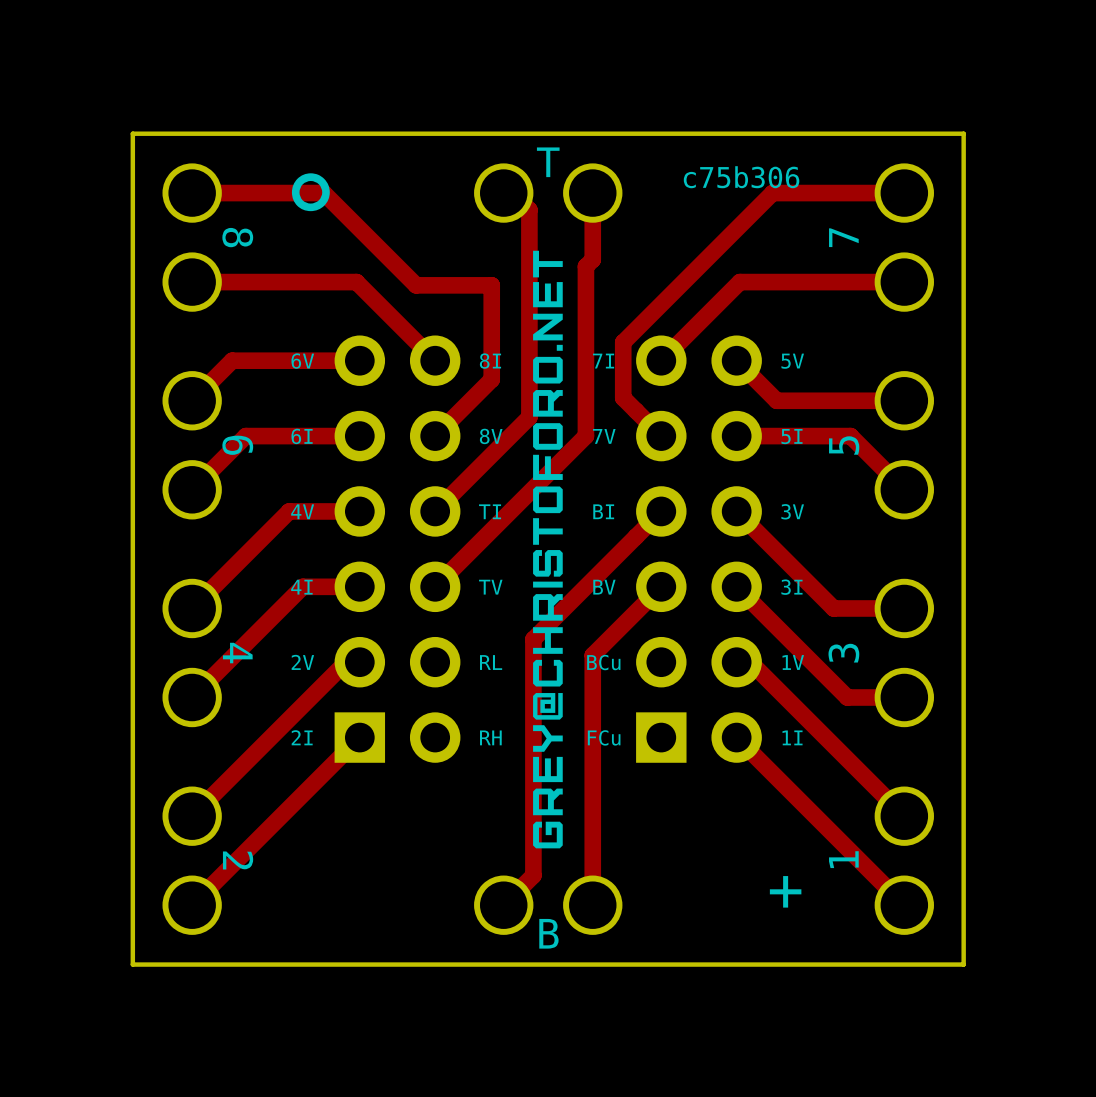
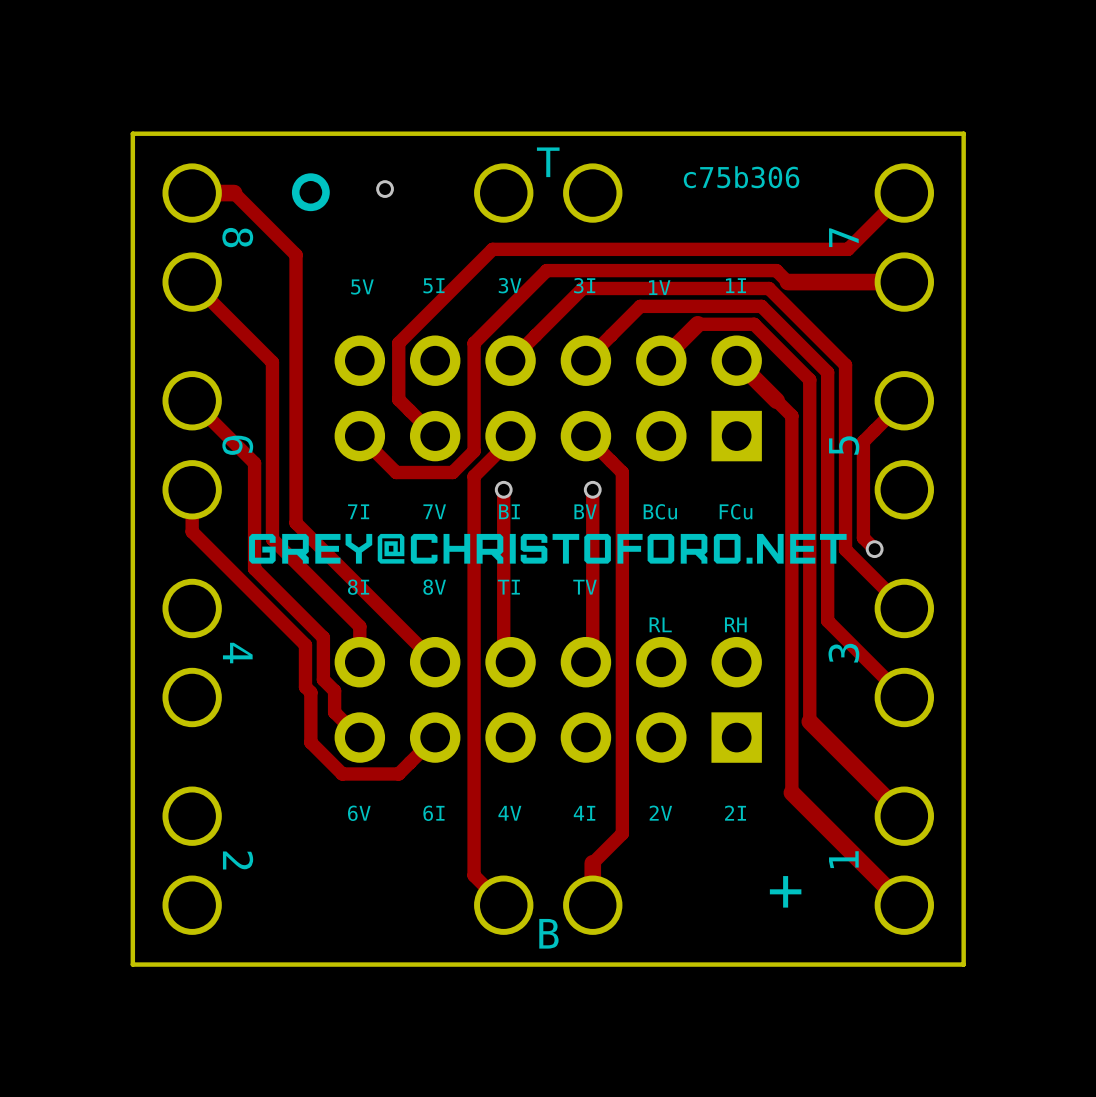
via: none -> (385, 189)
track: (234, 193) (323, 193) (416, 285) (491, 285) (491, 379) (435, 436) -> (234, 193) (296, 254) (296, 523) (435, 662)
track: (503, 193) (512, 193) (529, 209) (529, 417) (435, 511) -> none
track: (592, 193) (592, 259) (585, 266) (585, 436) (435, 586) -> none
track: (904, 193) (772, 193) (623, 342) (623, 398) (661, 436) -> (904, 193) (848, 249) (492, 249) (398, 343) (398, 399) (435, 436)
drawing shape: [533, 250, 563, 849] -> [249, 533, 847, 564]
track: (192, 282) (356, 282) (435, 360) -> (192, 282) (272, 362) (272, 539) (359, 626) (359, 662)
track: (787, 282) (739, 282) (697, 324) -> (787, 282) (776, 270) (546, 270) (474, 343) (474, 451) (452, 472) (396, 472) (359, 436)
track: (359, 360) (232, 360) (192, 400) -> (359, 737) (334, 712) (334, 690) (323, 679) (323, 637) (254, 568) (254, 463) (192, 400)
text position: 6V (302, 361) -> 6V (359, 813)
text position: 8I (490, 361) -> 8I (358, 587)
text position: 7I (603, 361) -> 7I (358, 511)
text position: 5V (792, 361) -> 5V (362, 287)
part: none -> (548, 398)
track: (776, 400) (904, 400) -> (874, 549) (863, 537) (863, 441) (904, 400)
text position: 6I (302, 436) -> 6I (433, 813)
track: (359, 436) (245, 436) (192, 489) -> (435, 737) (398, 774) (342, 774) (310, 742) (310, 692) (305, 687) (305, 645) (192, 531) (192, 489)
text position: 8V (491, 436) -> 8V (434, 587)
text position: 7V (604, 436) -> 7V (434, 511)
track: (736, 436) (850, 436) (904, 489) -> none
text position: 5I (792, 436) -> 5I (434, 285)
track: none -> (503, 489) (503, 655) (510, 662)
via: none -> (503, 489)
track: none -> (592, 489) (592, 655) (585, 662)
via: none -> (592, 489)
text position: 4V (302, 511) -> 4V (509, 813)
track: (359, 511) (289, 511) (192, 608) -> none
text position: TI (490, 511) -> TI (508, 587)
text position: BI (603, 511) -> BI (509, 511)
track: (661, 511) (533, 639) (533, 875) (503, 905) -> (510, 436) (510, 439) (474, 476) (474, 875) (503, 905)
track: (736, 511) (833, 608) (904, 608) -> (510, 360) (582, 288) (768, 288) (845, 365) (845, 549) (904, 608)
text position: 3V (792, 511) -> 3V (510, 285)
part: (397, 549) -> none
part: (698, 549) -> none
via: none -> (874, 549)
track: (359, 586) (302, 586) (192, 697) -> none
track: (661, 586) (592, 655) (592, 863) -> (585, 436) (622, 472) (622, 833) (592, 863)
track: (736, 586) (847, 697) (904, 697) -> (585, 360) (640, 306) (761, 306) (827, 372) (827, 620) (904, 697)
text position: 4I (301, 587) -> 4I (584, 813)
text position: TV (490, 587) -> TV (584, 587)
text position: BV (604, 587) -> BV (585, 511)
text position: 3I (791, 587) -> 3I (584, 285)
text position: 2V (302, 662) -> 2V (660, 813)
track: (359, 662) (346, 662) (192, 816) -> none
text position: RL (491, 662) -> RL (660, 624)
text position: BCu (603, 662) -> BCu (660, 511)
track: (736, 662) (750, 662) (809, 721) -> (697, 324) (754, 324) (809, 379) (809, 721)
text position: 1V (793, 662) -> 1V (659, 287)
part: none -> (548, 699)
text position: 2I (302, 737) -> 2I (735, 813)
track: (359, 737) (192, 905) -> none
text position: RH (490, 737) -> RH (735, 624)
text position: FCu (604, 737) -> FCu (736, 511)
track: (736, 737) (791, 792) -> (776, 400) (791, 415) (791, 792)
text position: 1I (792, 737) -> 1I (735, 285)

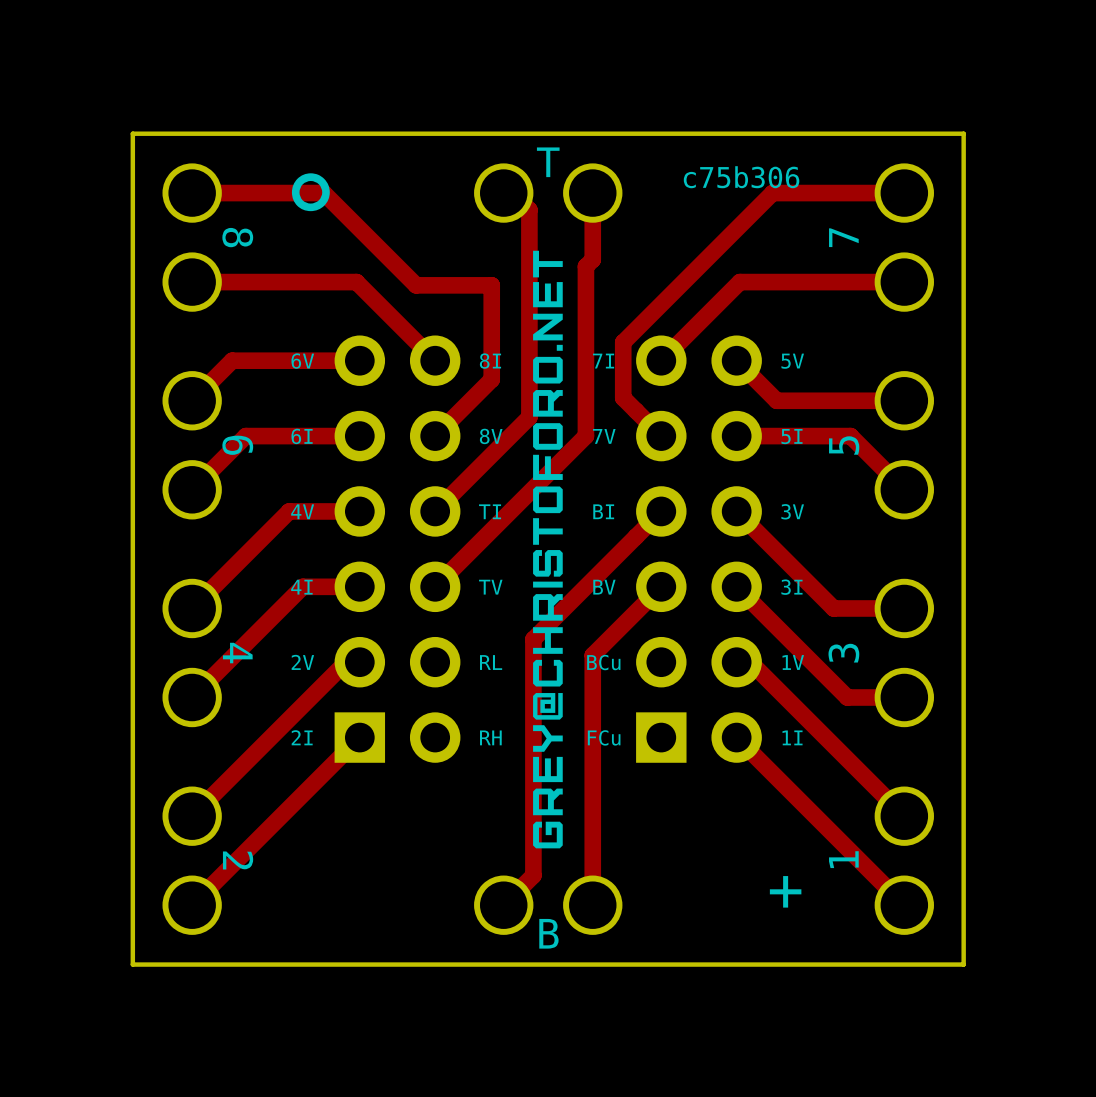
via: (385, 189) -> none
track: (234, 193) (296, 254) (296, 523) (435, 662) -> (234, 193) (323, 193) (416, 285) (491, 285) (491, 379) (435, 436)
track: none -> (503, 193) (512, 193) (529, 209) (529, 417) (435, 511)
track: none -> (592, 193) (592, 259) (585, 266) (585, 436) (435, 586)
track: (904, 193) (848, 249) (492, 249) (398, 343) (398, 399) (435, 436) -> (904, 193) (772, 193) (623, 342) (623, 398) (661, 436)
track: (192, 282) (272, 362) (272, 539) (359, 626) (359, 662) -> (192, 282) (356, 282) (435, 360)
track: (787, 282) (776, 270) (546, 270) (474, 343) (474, 451) (452, 472) (396, 472) (359, 436) -> (787, 282) (739, 282) (697, 324)
text position: 5I (434, 285) -> 5I (792, 436)
text position: 3V (510, 285) -> 3V (792, 511)
text position: 3I (584, 285) -> 3I (791, 587)
text position: 1I (735, 285) -> 1I (792, 737)
text position: 5V (362, 287) -> 5V (792, 361)
text position: 1V (659, 287) -> 1V (793, 662)
track: (697, 324) (754, 324) (809, 379) (809, 721) -> (736, 662) (750, 662) (809, 721)
track: (510, 360) (582, 288) (768, 288) (845, 365) (845, 549) (904, 608) -> (736, 511) (833, 608) (904, 608)
track: (585, 360) (640, 306) (761, 306) (827, 372) (827, 620) (904, 697) -> (736, 586) (847, 697) (904, 697)
part: (548, 398) -> none
track: (192, 400) (254, 463) (254, 568) (323, 637) (323, 679) (334, 690) (334, 712) (359, 737) -> (192, 400) (232, 360) (359, 360)
track: (776, 400) (791, 415) (791, 792) -> (736, 737) (791, 792)
track: (904, 400) (863, 441) (863, 537) (874, 549) -> (904, 400) (776, 400)
track: (510, 436) (510, 439) (474, 476) (474, 875) (503, 905) -> (661, 511) (533, 639) (533, 875) (503, 905)
track: (585, 436) (622, 472) (622, 833) (592, 863) -> (661, 586) (592, 655) (592, 863)
track: none -> (736, 436) (850, 436) (904, 489)
track: (192, 489) (192, 531) (305, 645) (305, 687) (310, 692) (310, 742) (342, 774) (398, 774) (435, 737) -> (192, 489) (245, 436) (359, 436)
track: (503, 489) (503, 655) (510, 662) -> none
via: (503, 489) -> none
track: (592, 489) (592, 655) (585, 662) -> none
via: (592, 489) -> none
text position: 7I (358, 511) -> 7I (603, 361)
track: none -> (359, 511) (289, 511) (192, 608)
text position: 7V (434, 511) -> 7V (604, 436)
text position: BI (509, 511) -> BI (603, 511)
text position: BV (585, 511) -> BV (604, 587)
text position: BCu (660, 511) -> BCu (603, 662)
text position: FCu (736, 511) -> FCu (604, 737)
drawing shape: [249, 533, 847, 564] -> [533, 250, 563, 849]
part: none -> (397, 549)
part: none -> (698, 549)
via: (874, 549) -> none
track: none -> (359, 586) (302, 586) (192, 697)
text position: 8I (358, 587) -> 8I (490, 361)
text position: 8V (434, 587) -> 8V (491, 436)
text position: TI (508, 587) -> TI (490, 511)
text position: TV (584, 587) -> TV (490, 587)
text position: RL (660, 624) -> RL (491, 662)
text position: RH (735, 624) -> RH (490, 737)
track: none -> (359, 662) (346, 662) (192, 816)
part: (548, 699) -> none
track: none -> (359, 737) (192, 905)
text position: 6V (359, 813) -> 6V (302, 361)
text position: 6I (433, 813) -> 6I (302, 436)
text position: 4V (509, 813) -> 4V (302, 511)
text position: 4I (584, 813) -> 4I (301, 587)
text position: 2V (660, 813) -> 2V (302, 662)
text position: 2I (735, 813) -> 2I (302, 737)

